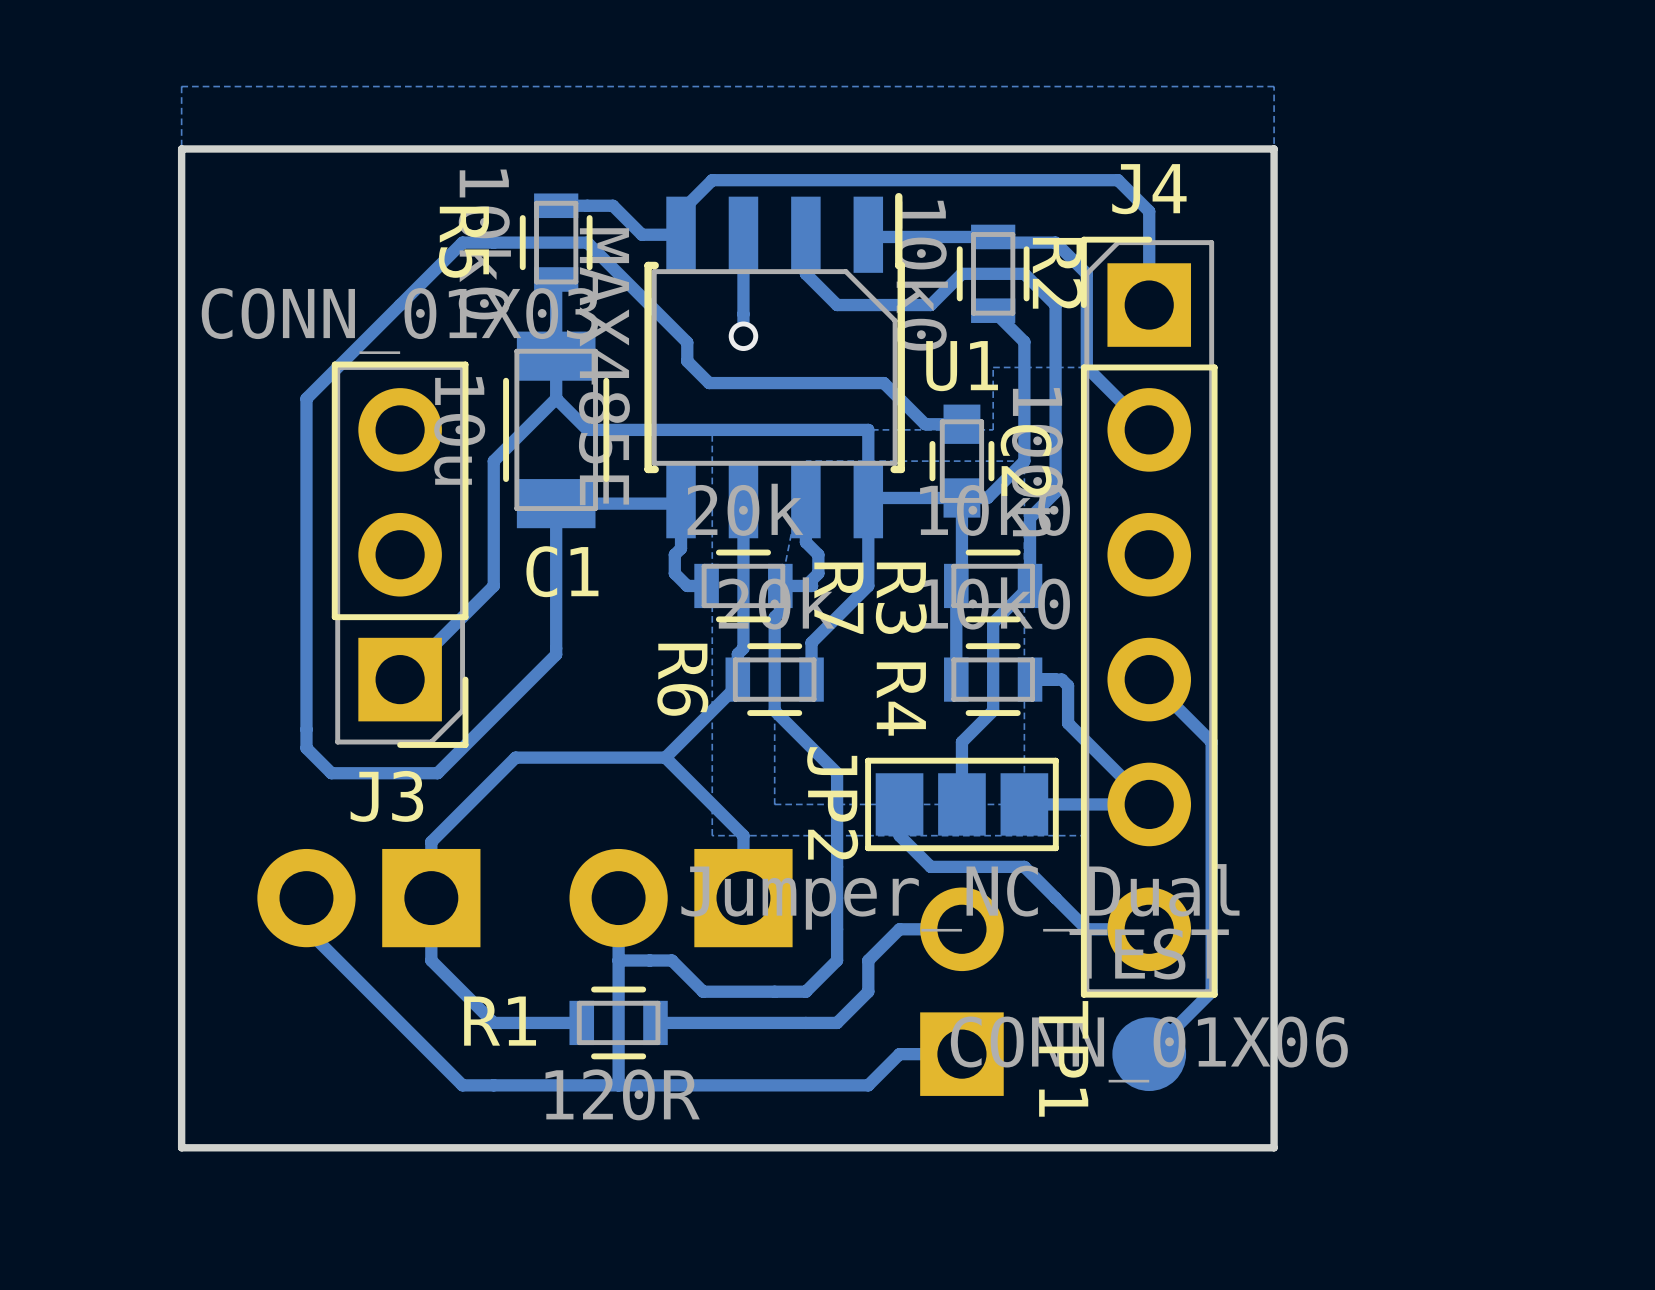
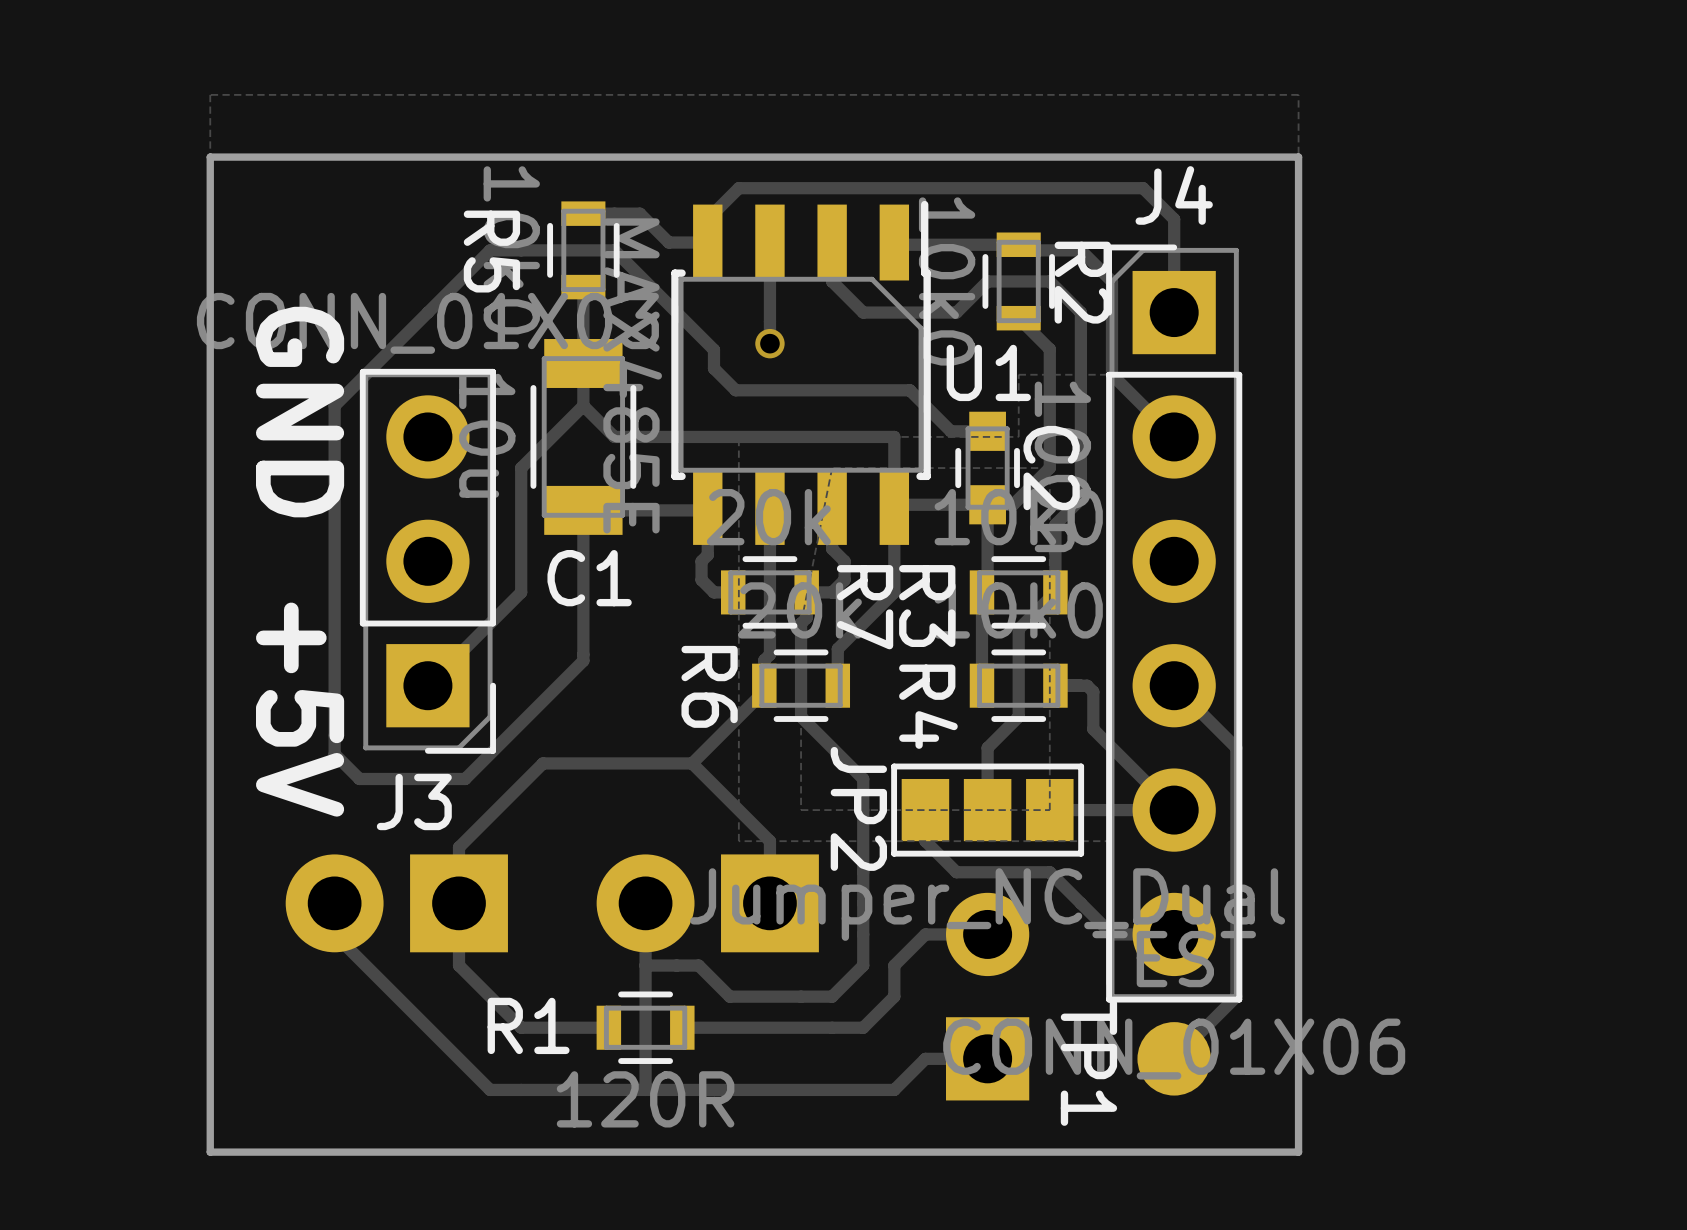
text: none -> GND (300, 412)
text: none -> +5V (300, 709)

